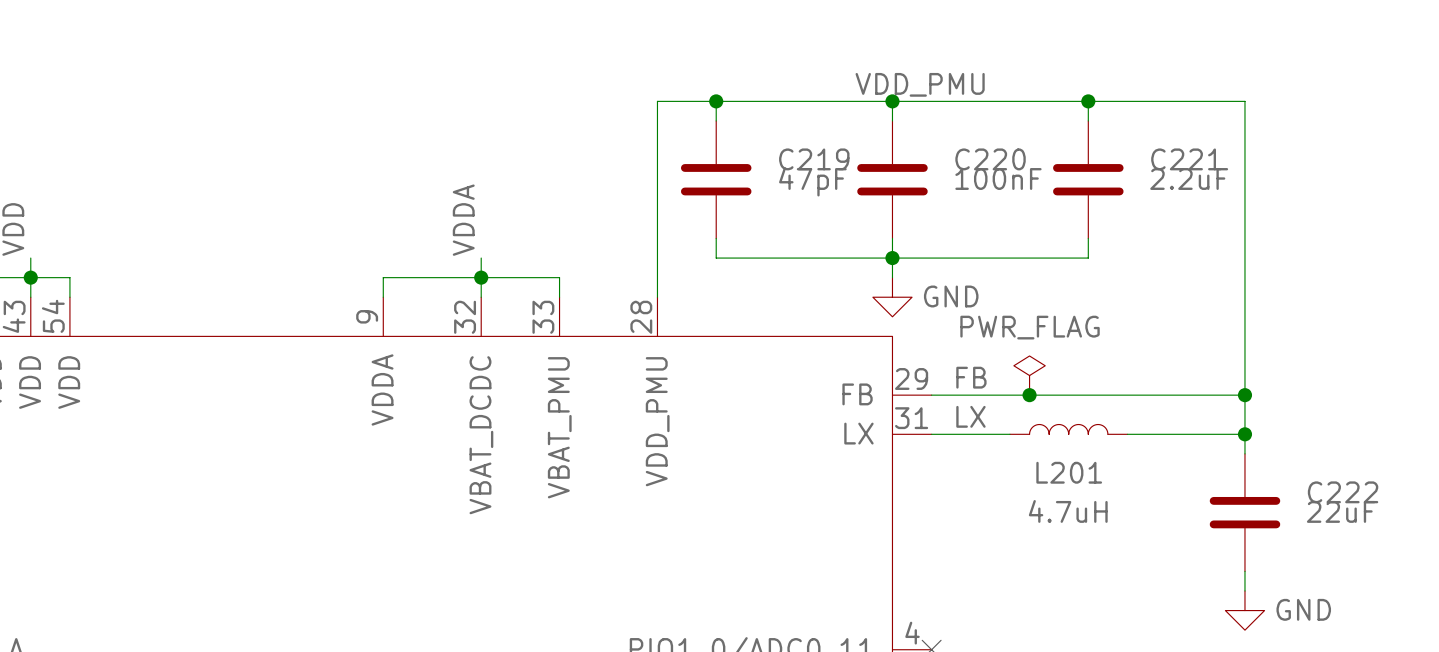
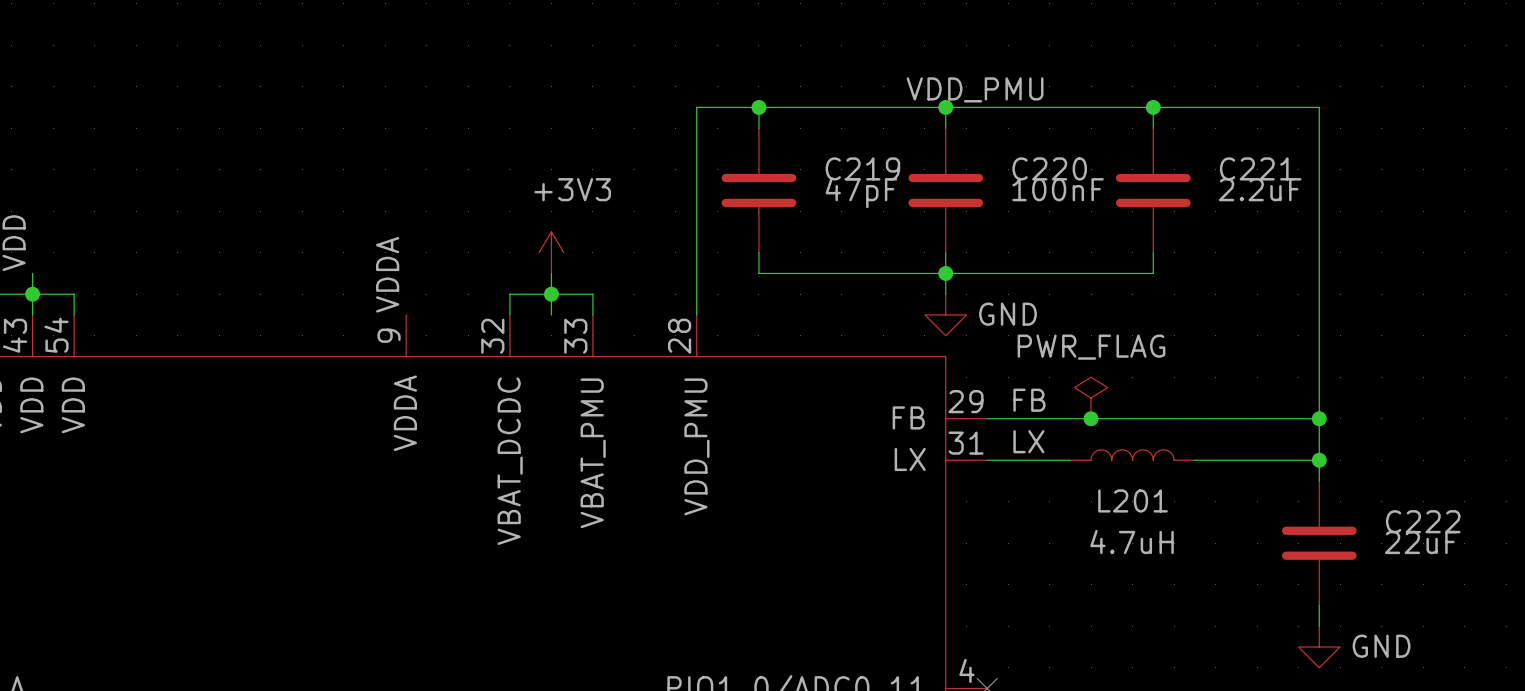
label position: VDDA (463, 220) -> VDDA (387, 274)
power symbol: none -> +3V3 (551, 252)
wire: (481, 258) (481, 277) (383, 277) (383, 297) -> none
wire: none -> (551, 273) (551, 314)
junction position: (481, 277) -> (551, 294)

